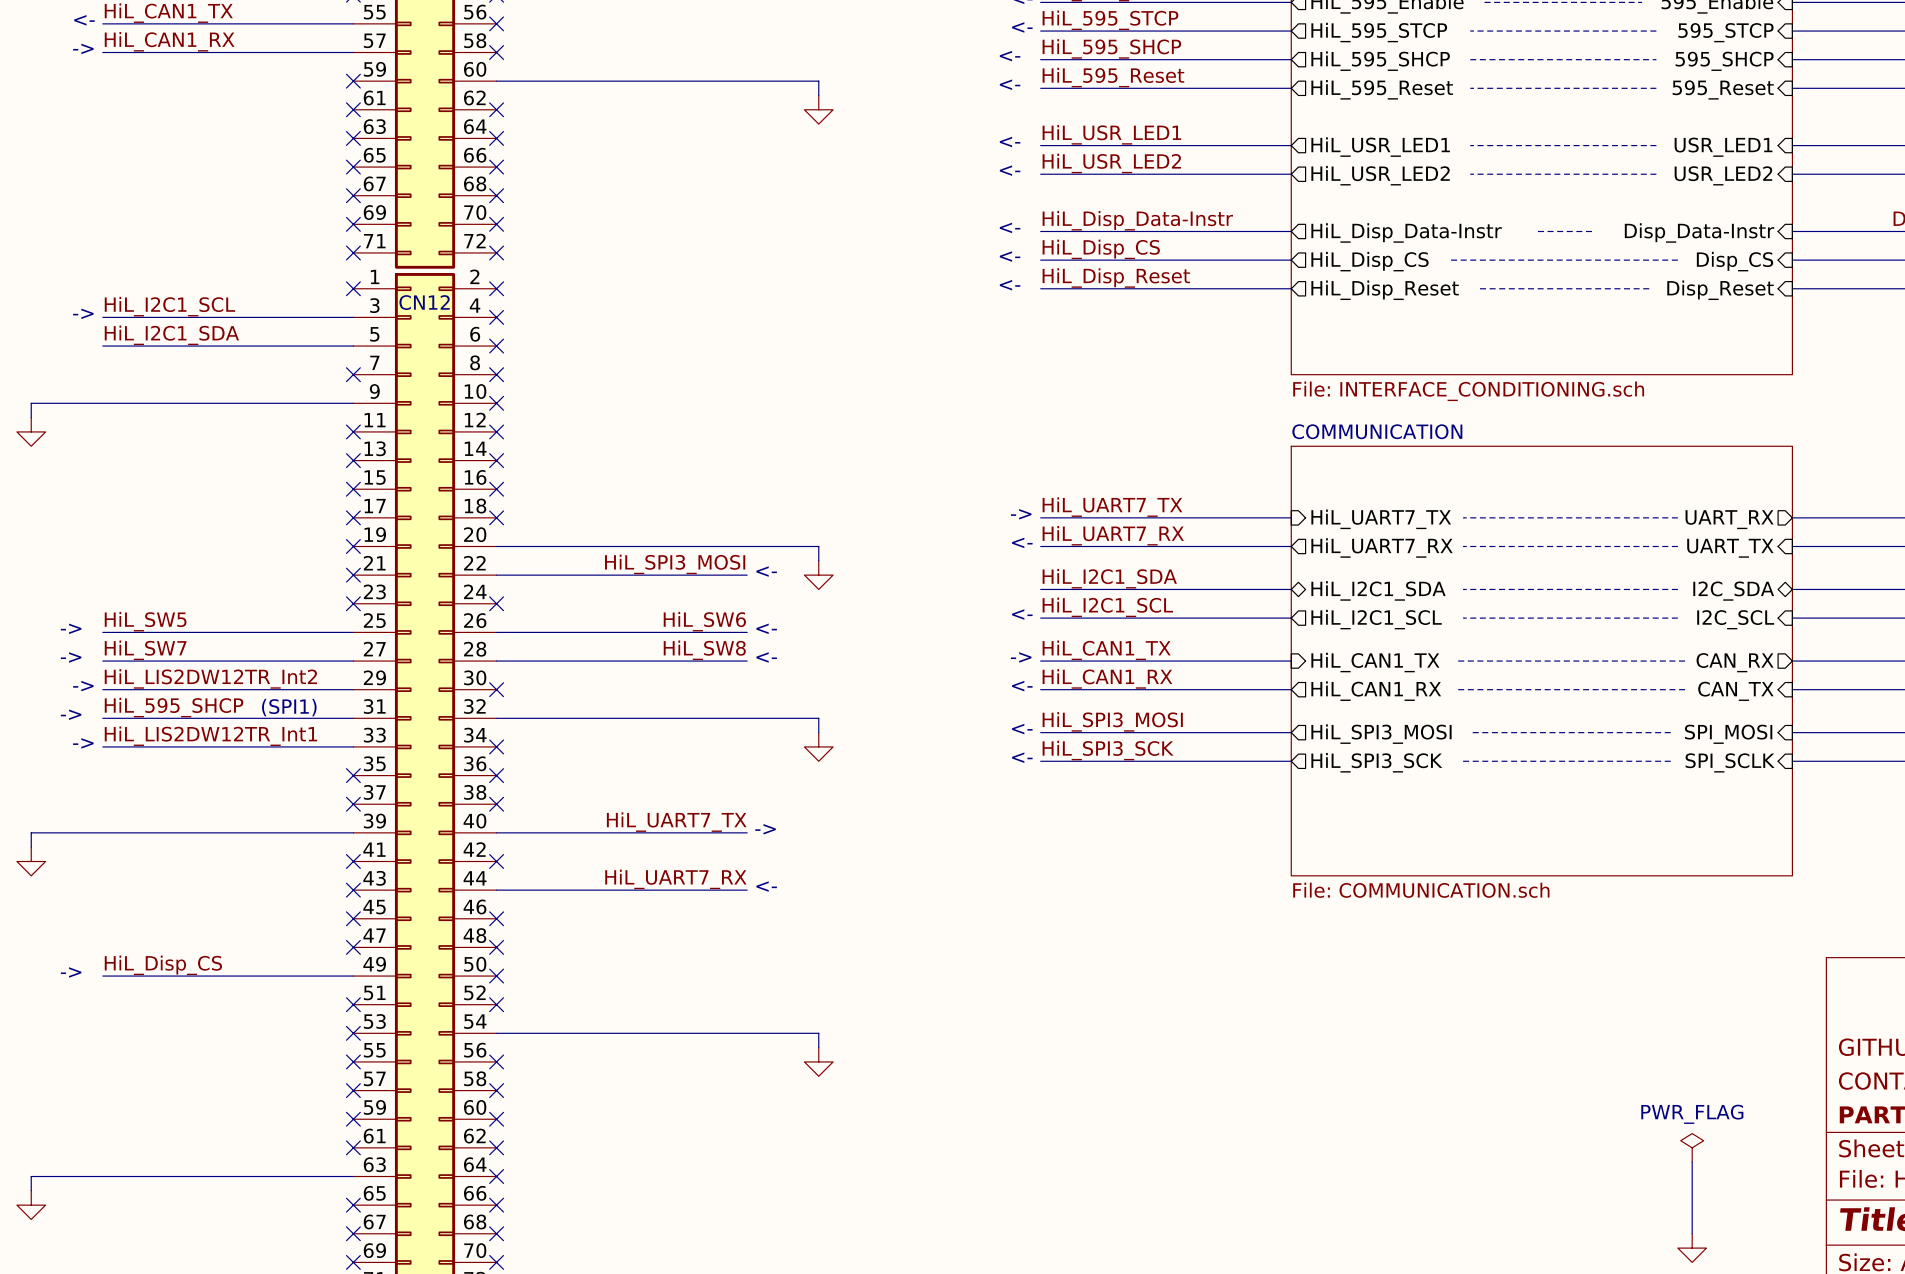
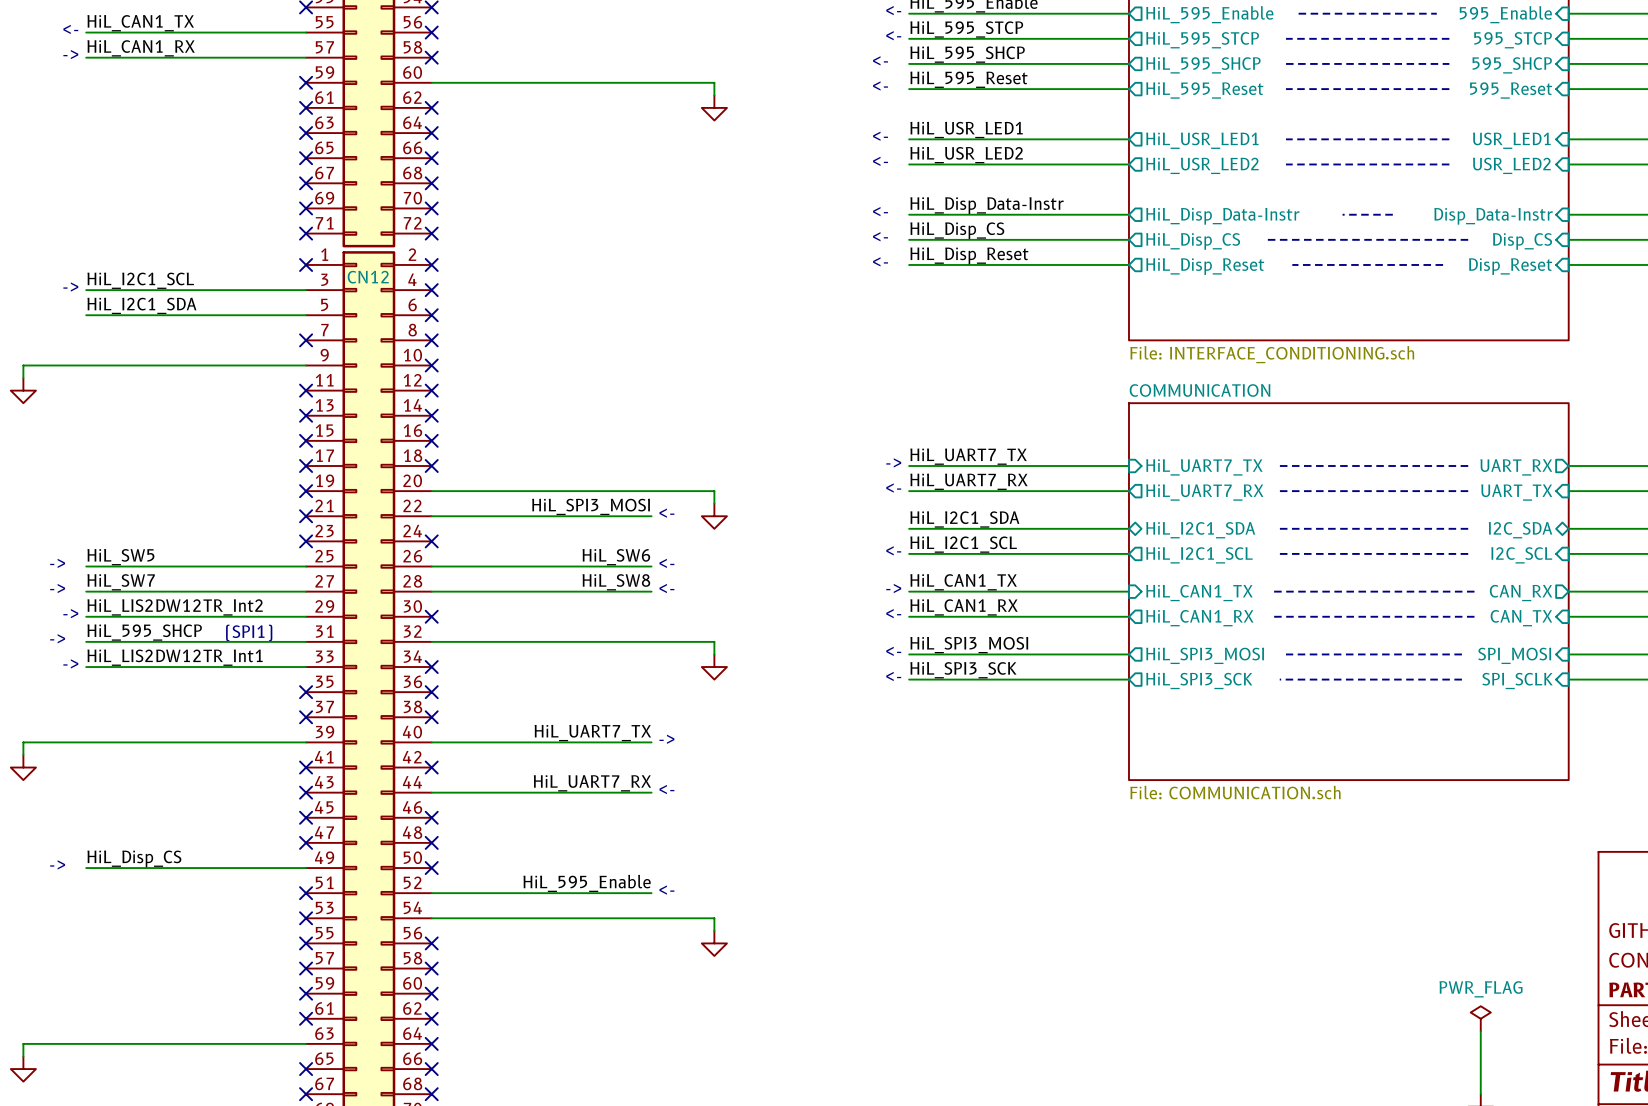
label: none -> HiL_595_Enable (587, 883)
text: none -> <- (666, 890)
wire: none -> (431, 893) (651, 893)
no-connect mark: (496, 1004) -> none

